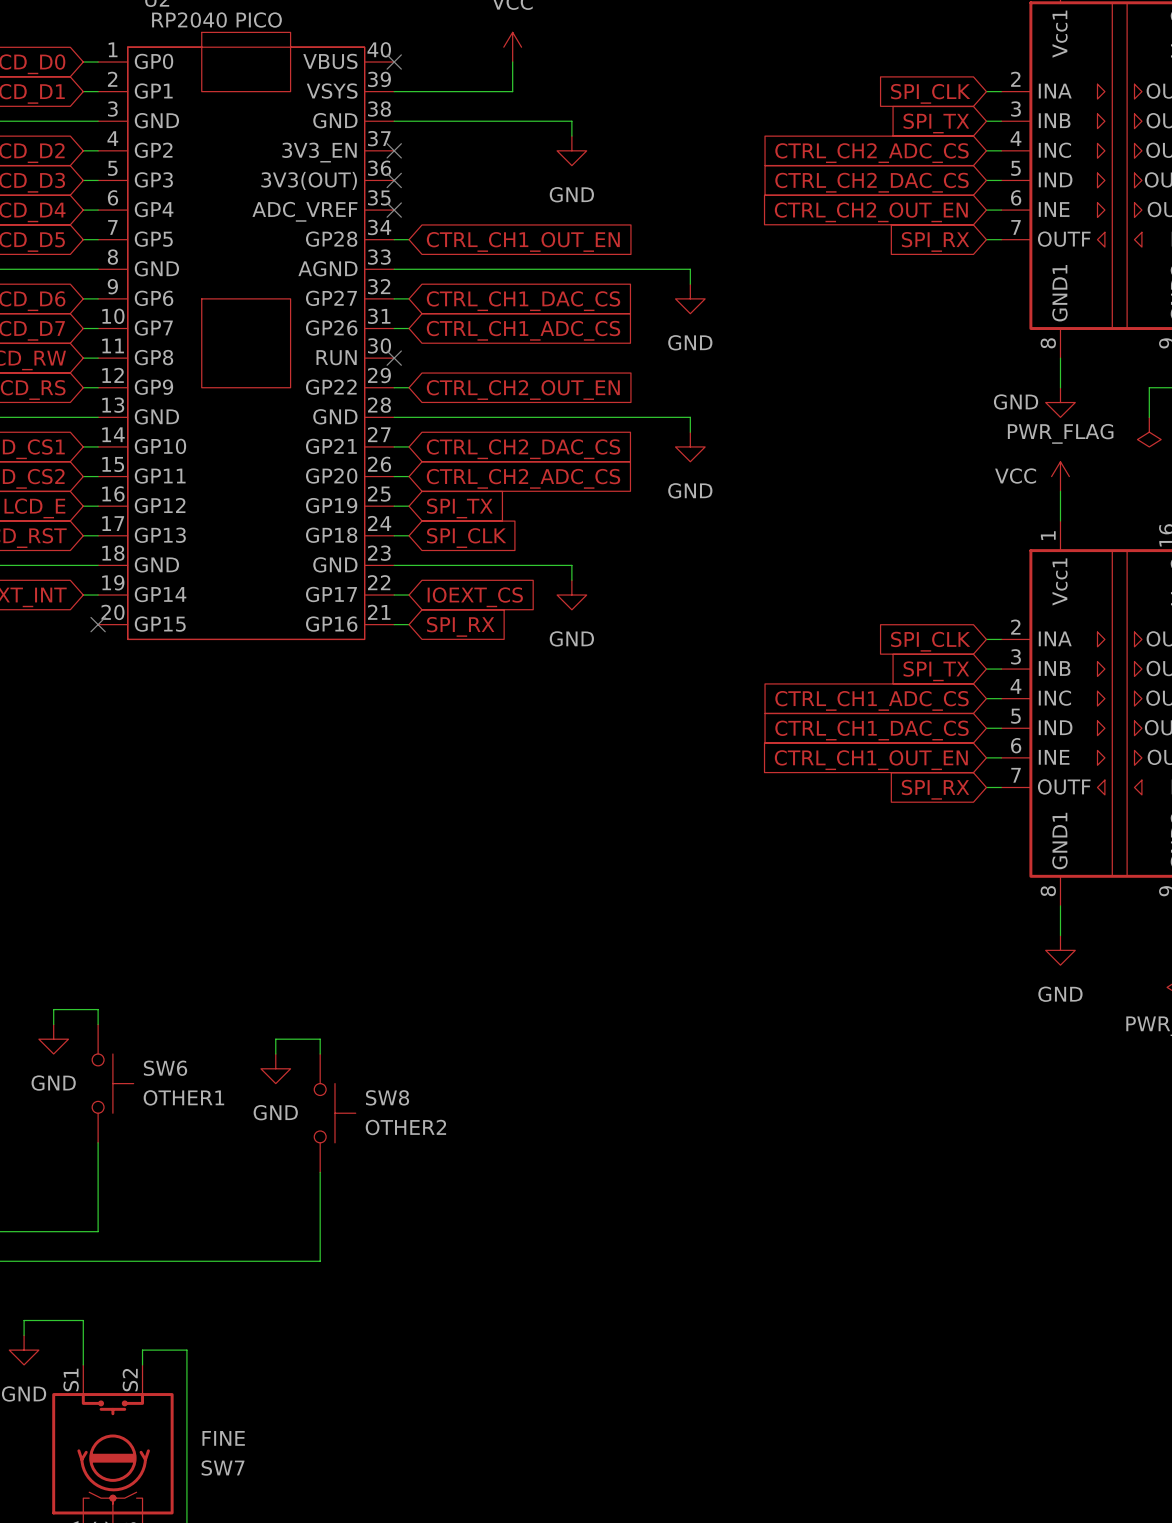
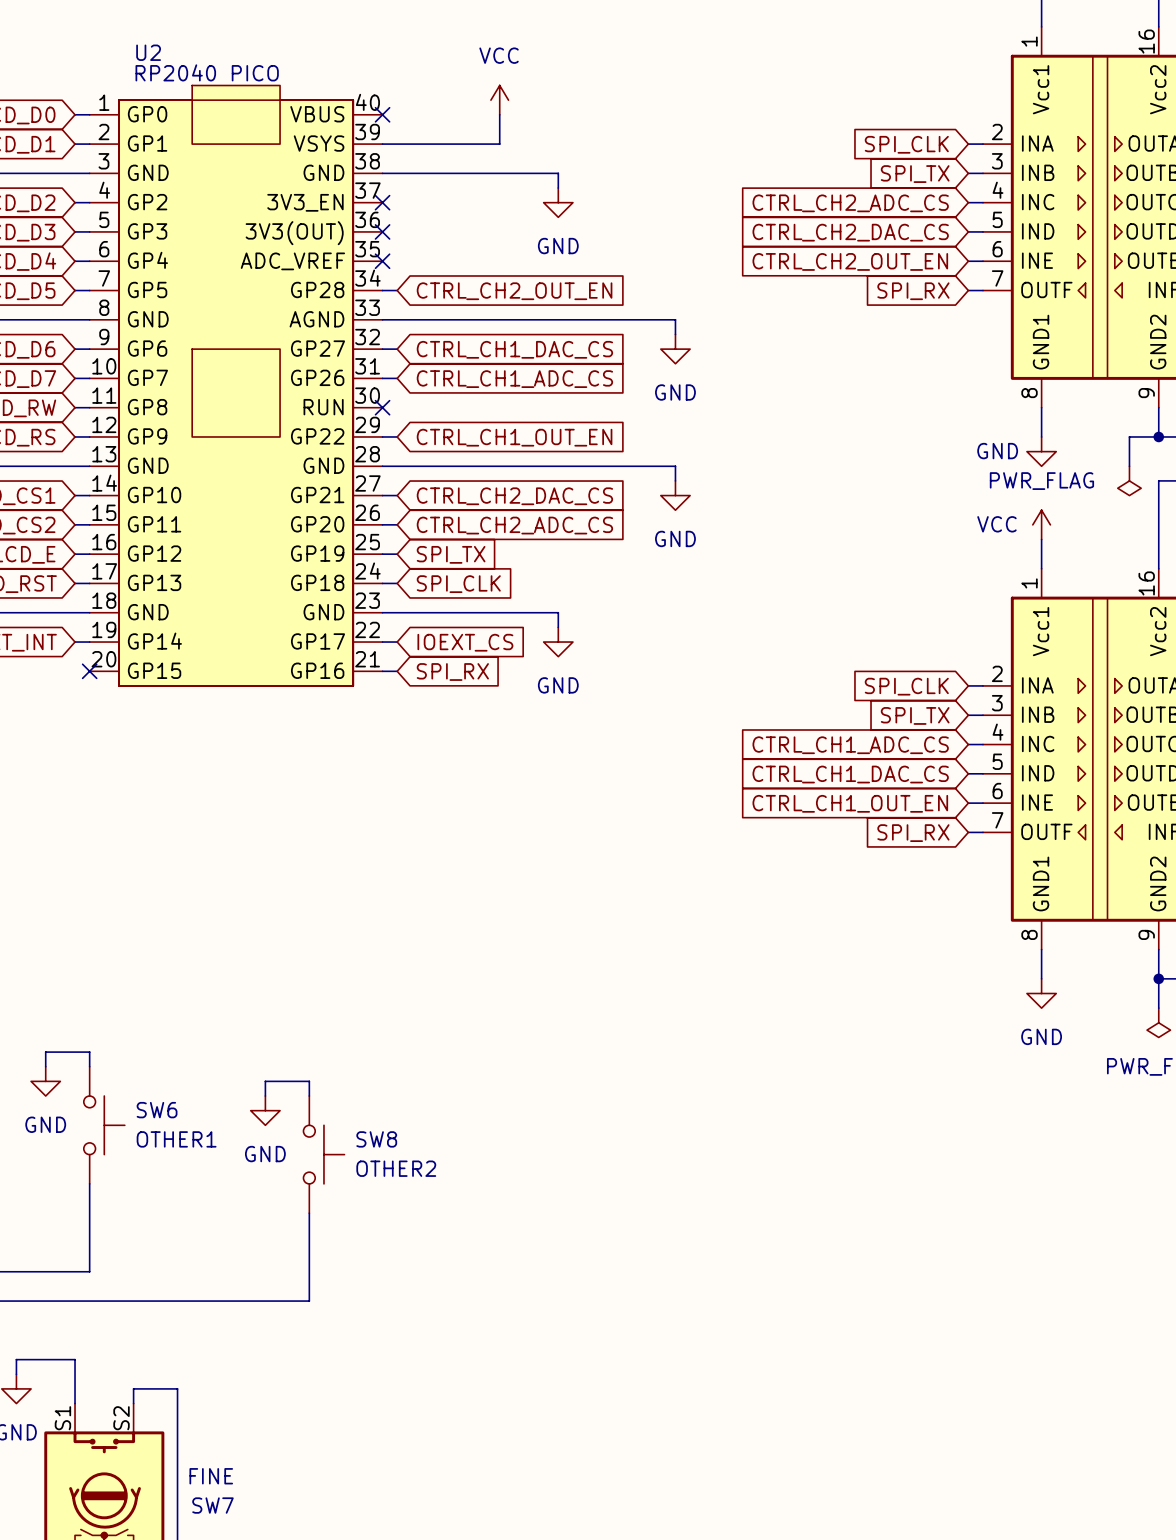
global label: CTRL_CH1_OUT_EN (523, 241) -> CTRL_CH2_OUT_EN (514, 291)
global label: CTRL_CH2_OUT_EN (523, 389) -> CTRL_CH1_OUT_EN (514, 437)

